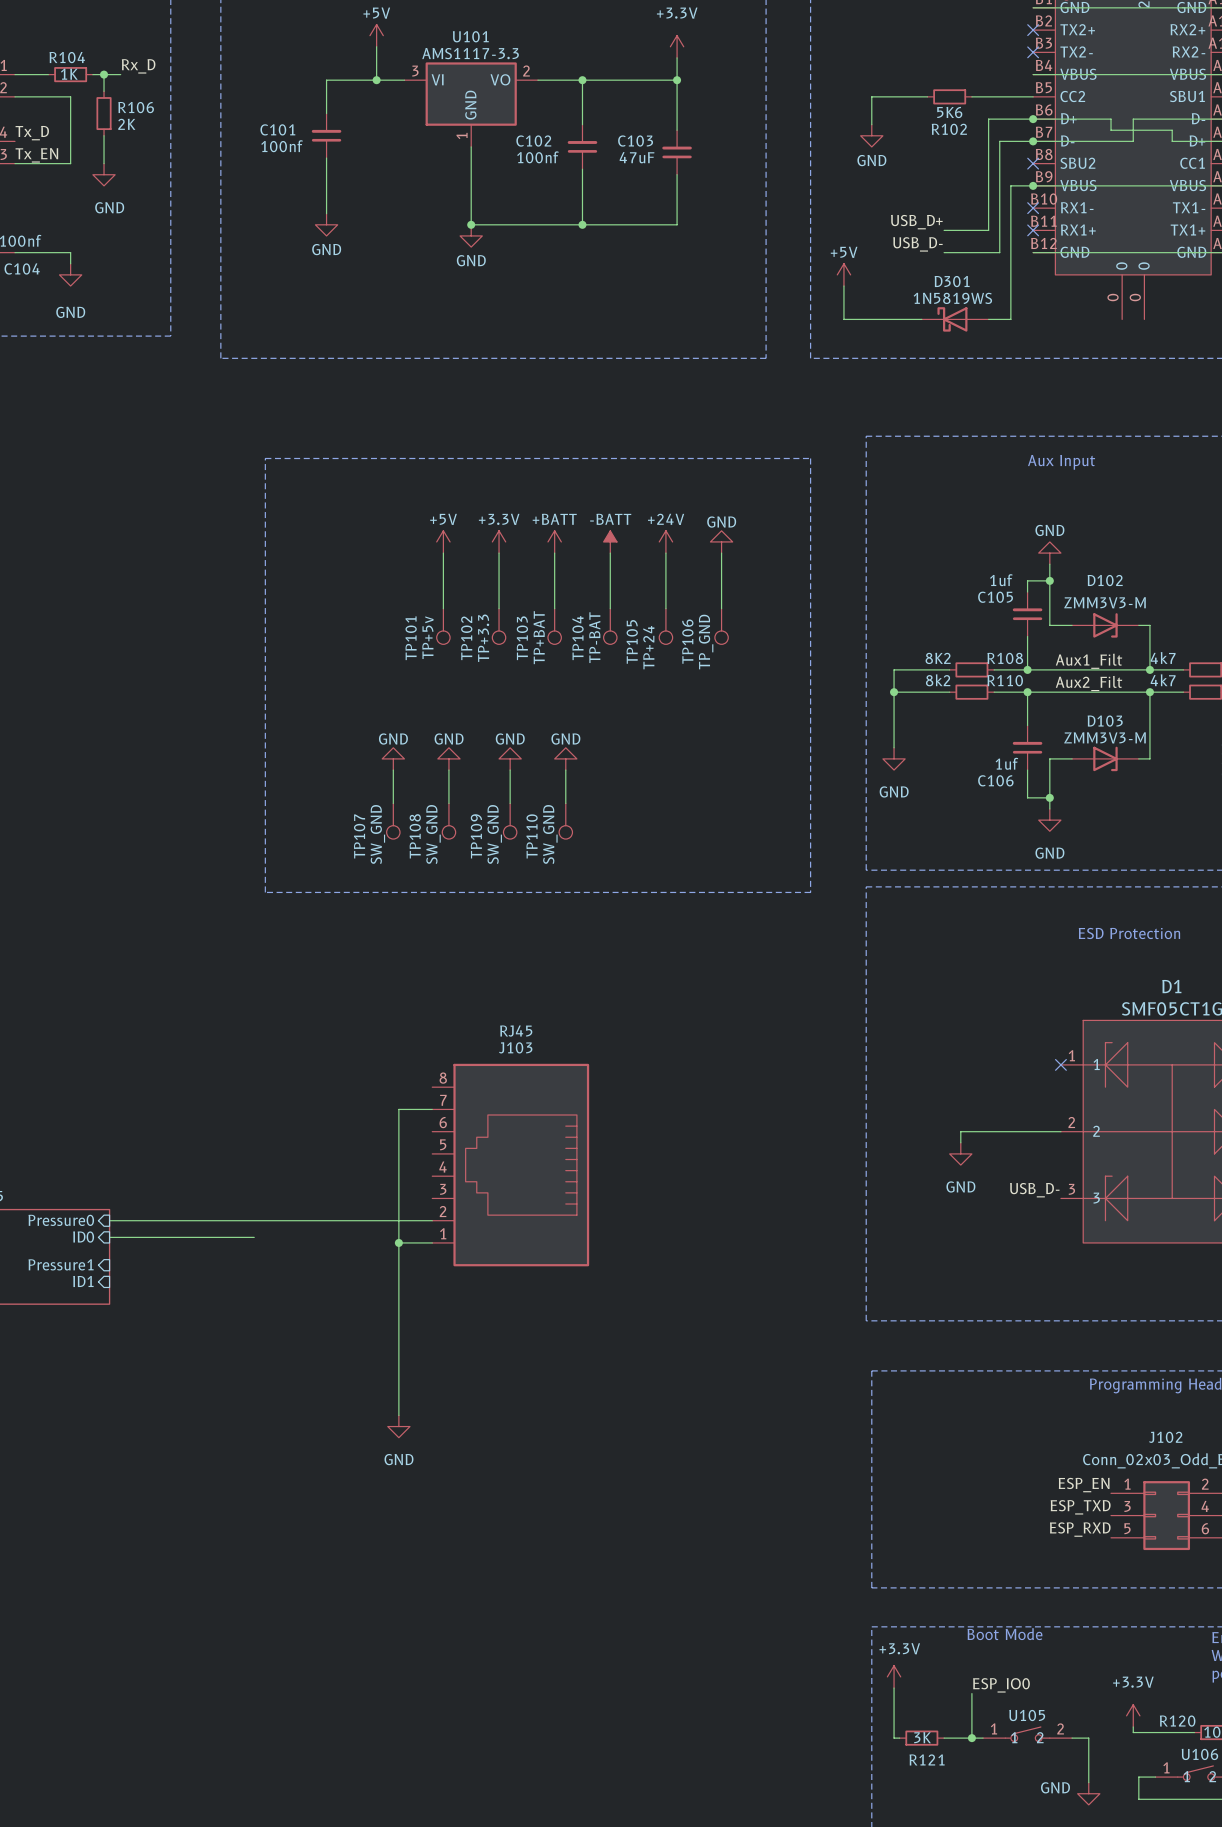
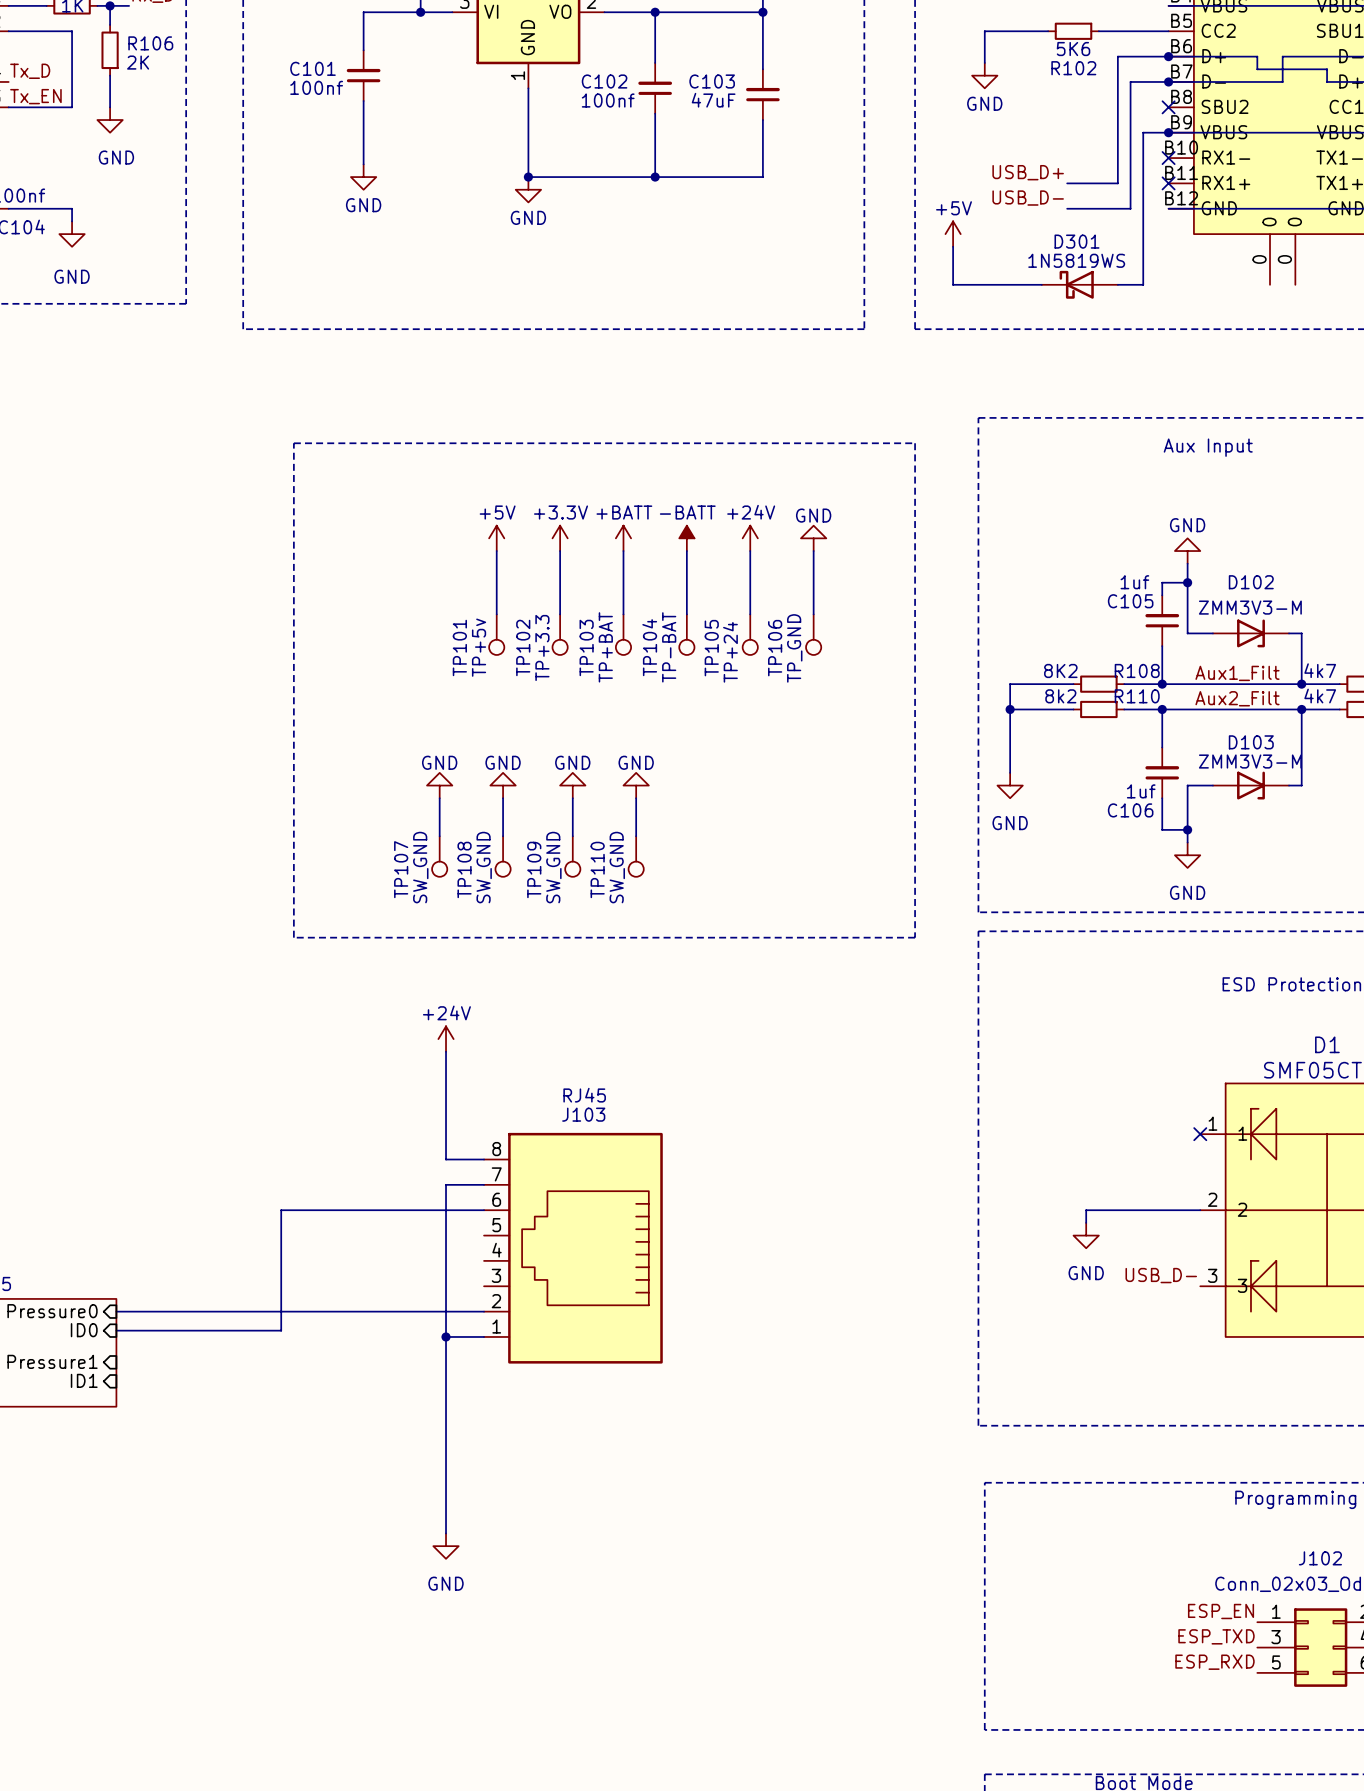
power symbol: none -> +24V (446, 1039)
wire: none -> (446, 1051) (446, 1159) (484, 1159)
wire: none -> (484, 1210) (281, 1210) (281, 1330)

